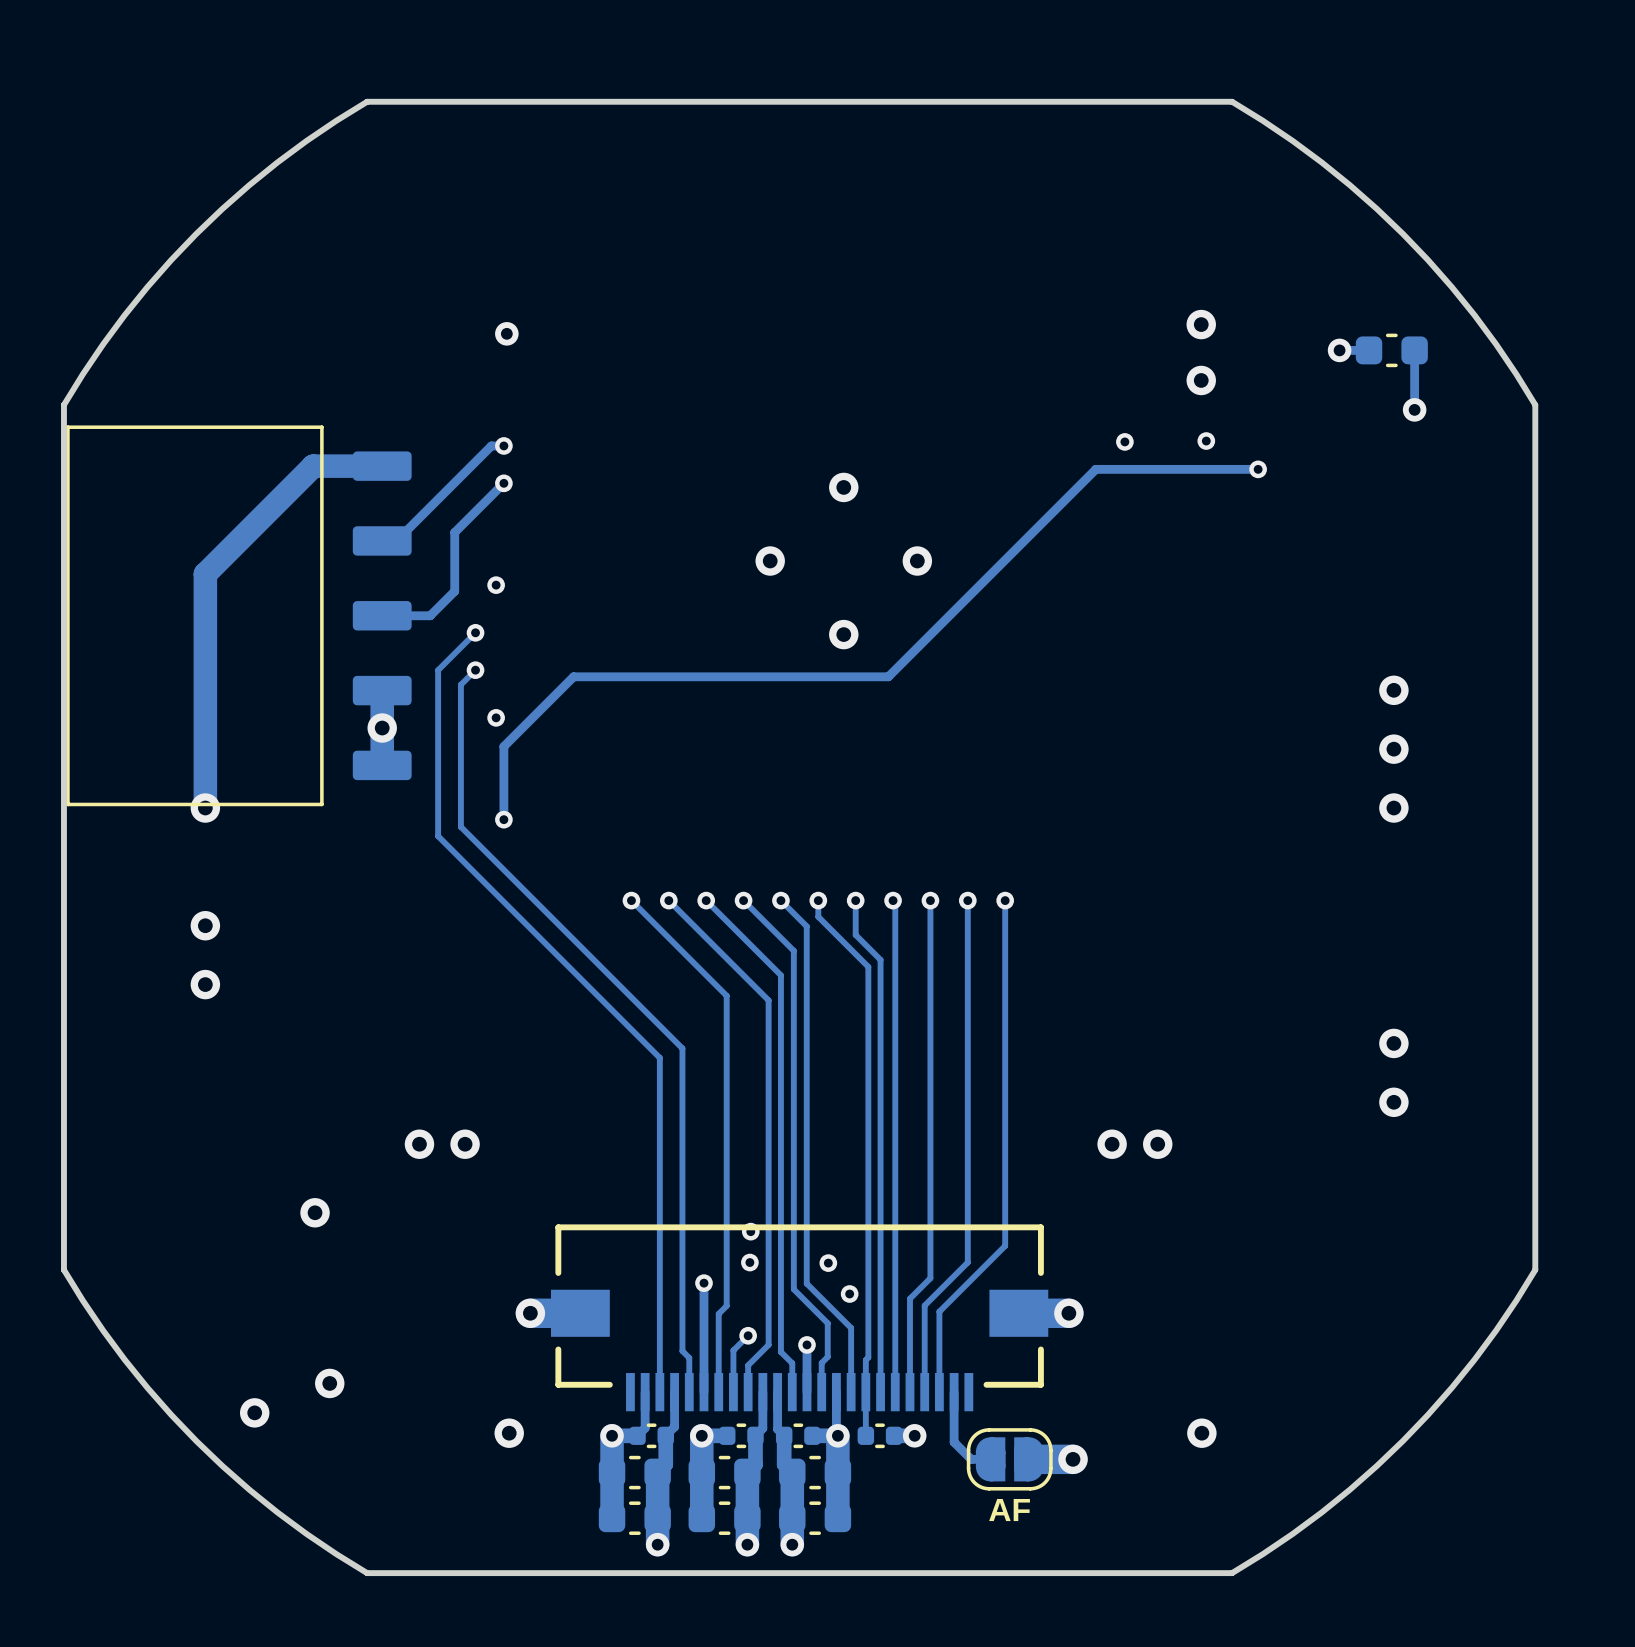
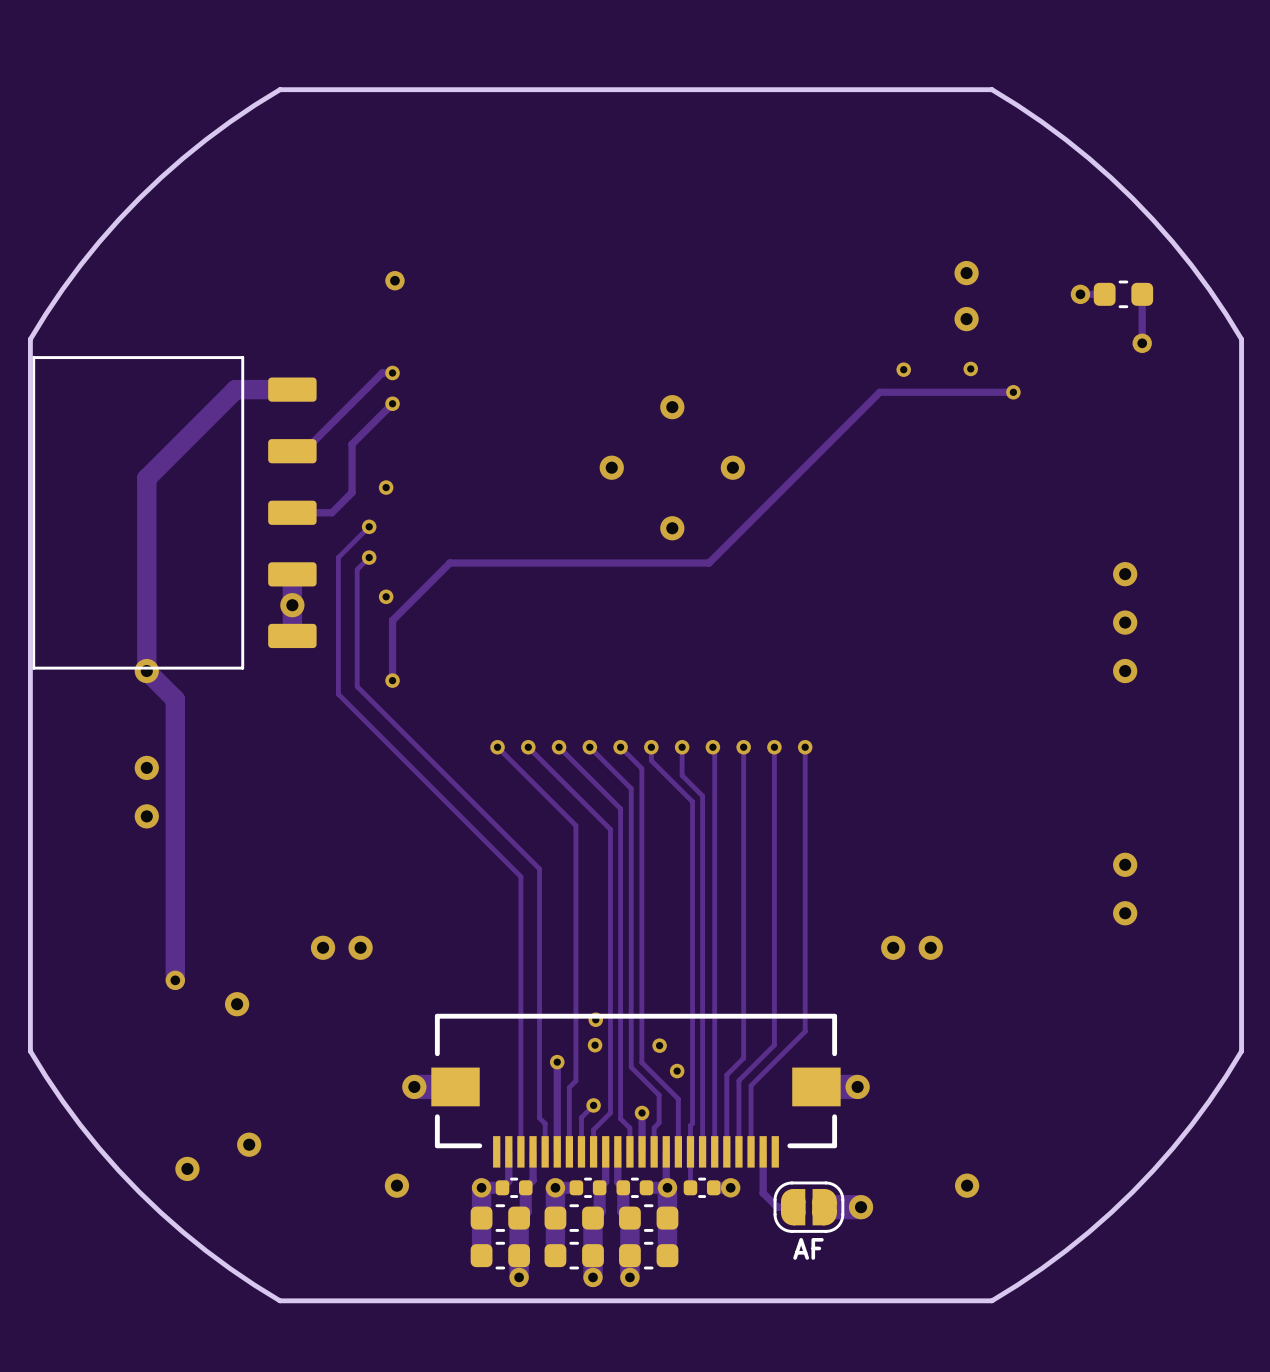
track: none -> (146, 671) (175, 699) (175, 980)
via: none -> (175, 980)

